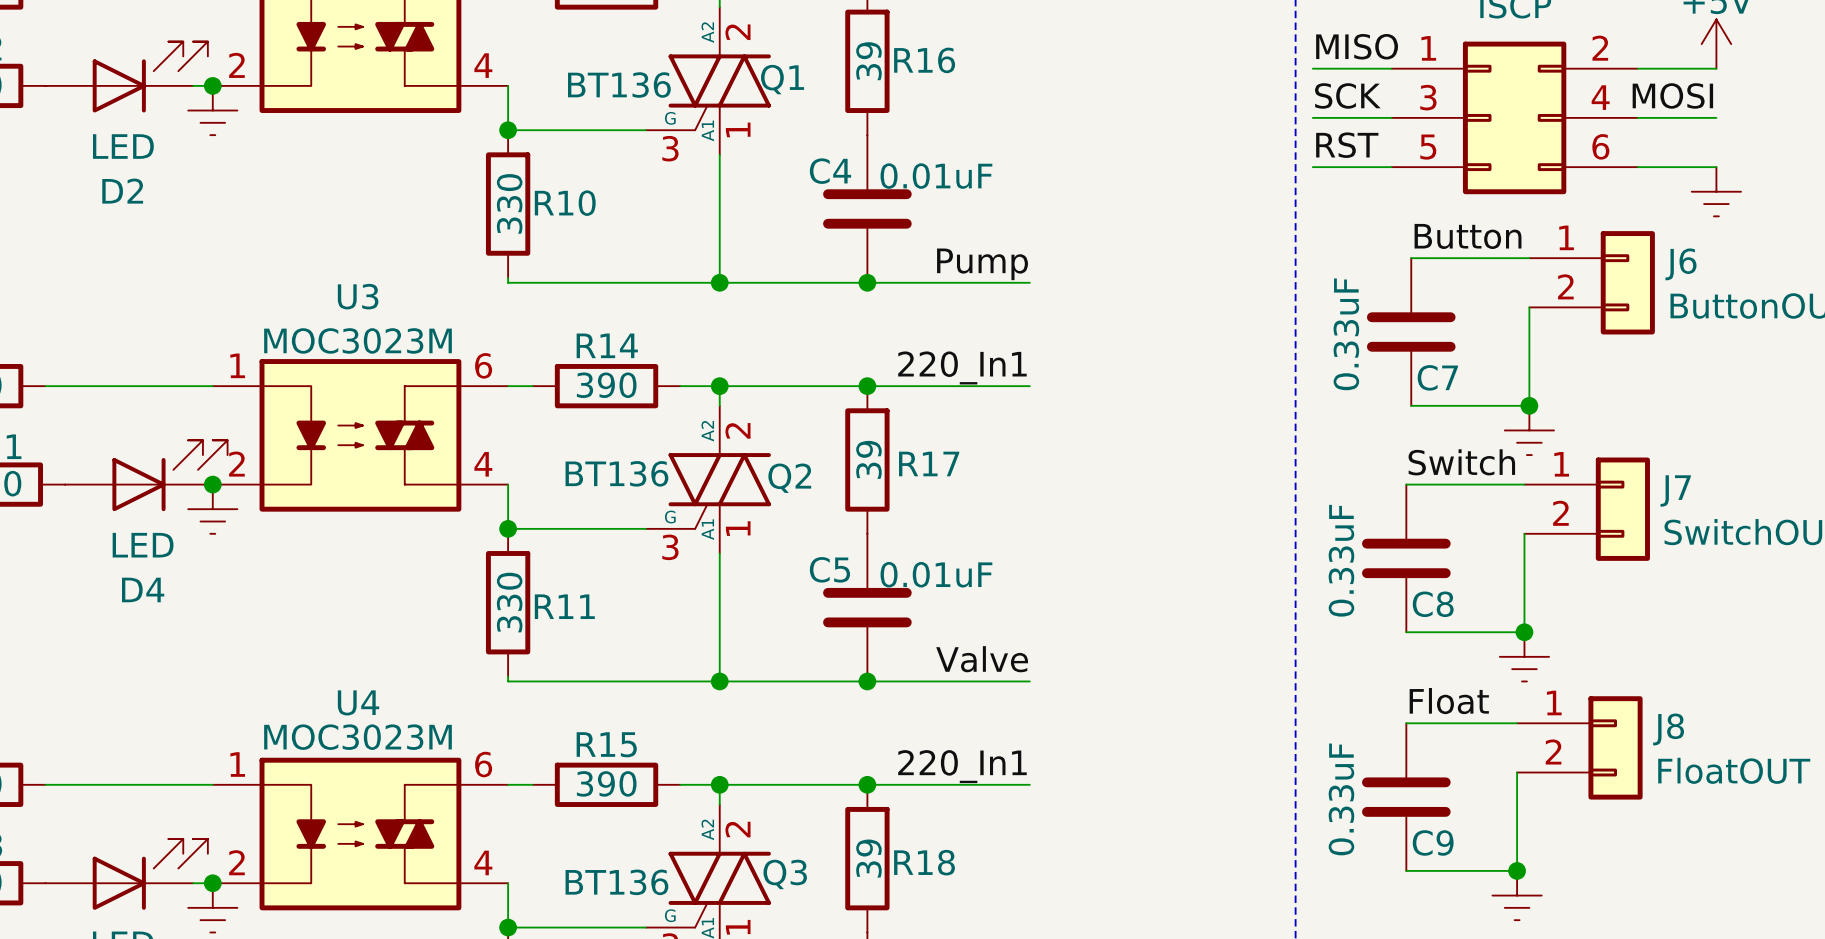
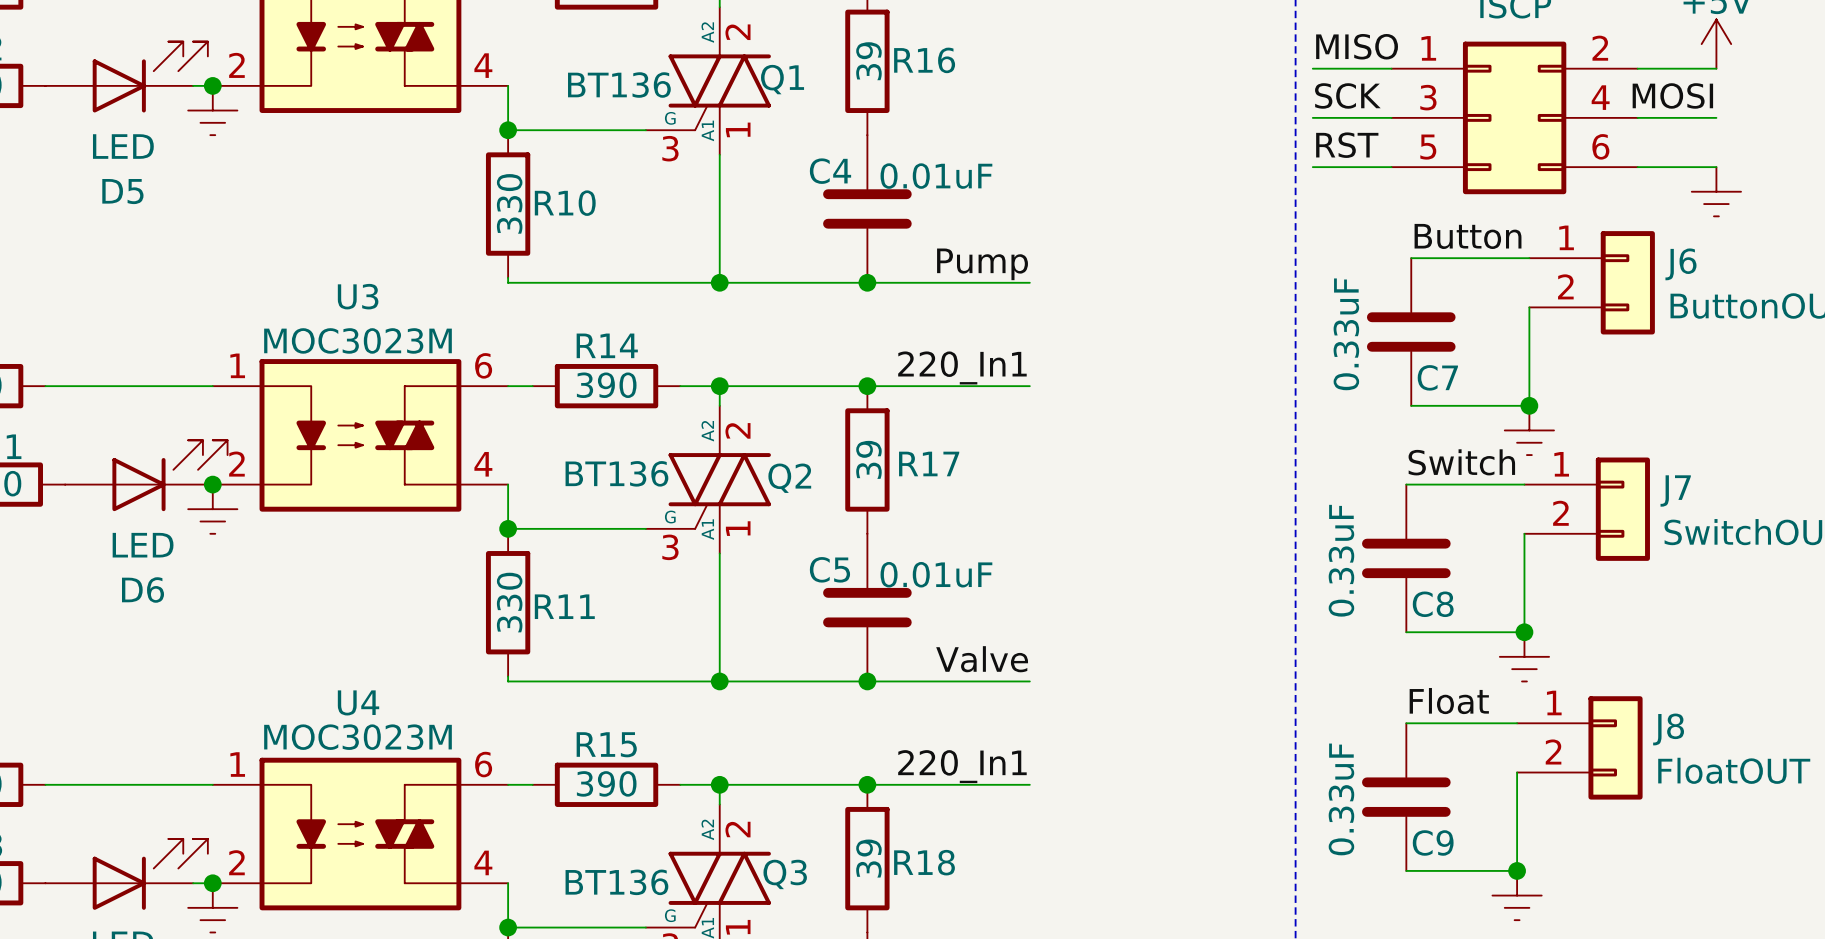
D2 name: D2 (122, 191) -> D5 (122, 191)
D4 name: D4 (143, 589) -> D6 (143, 589)

